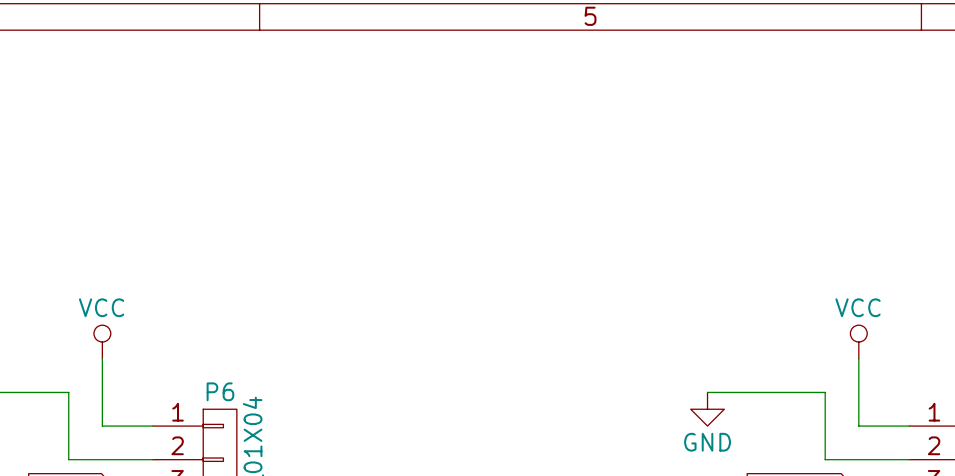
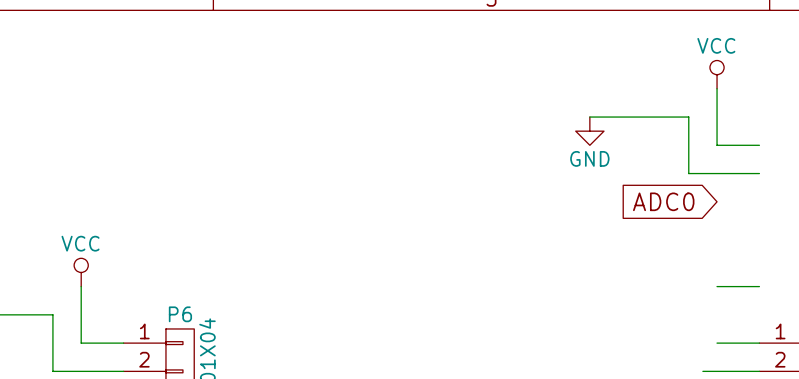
power symbol: none -> VCC (717, 74)
wire: none -> (717, 88) (717, 145) (759, 145)
wire: none -> (589, 117) (688, 117) (688, 173) (759, 173)
power symbol: none -> GND (589, 131)
global label: none -> ADC0 (663, 201)
power symbol: VCC (858, 342) -> none
wire: (858, 358) (858, 426) -> (717, 286) (759, 286)
wire: (707, 392) (825, 392) (825, 459) (842, 459) -> none
power symbol: GND (707, 409) -> none

